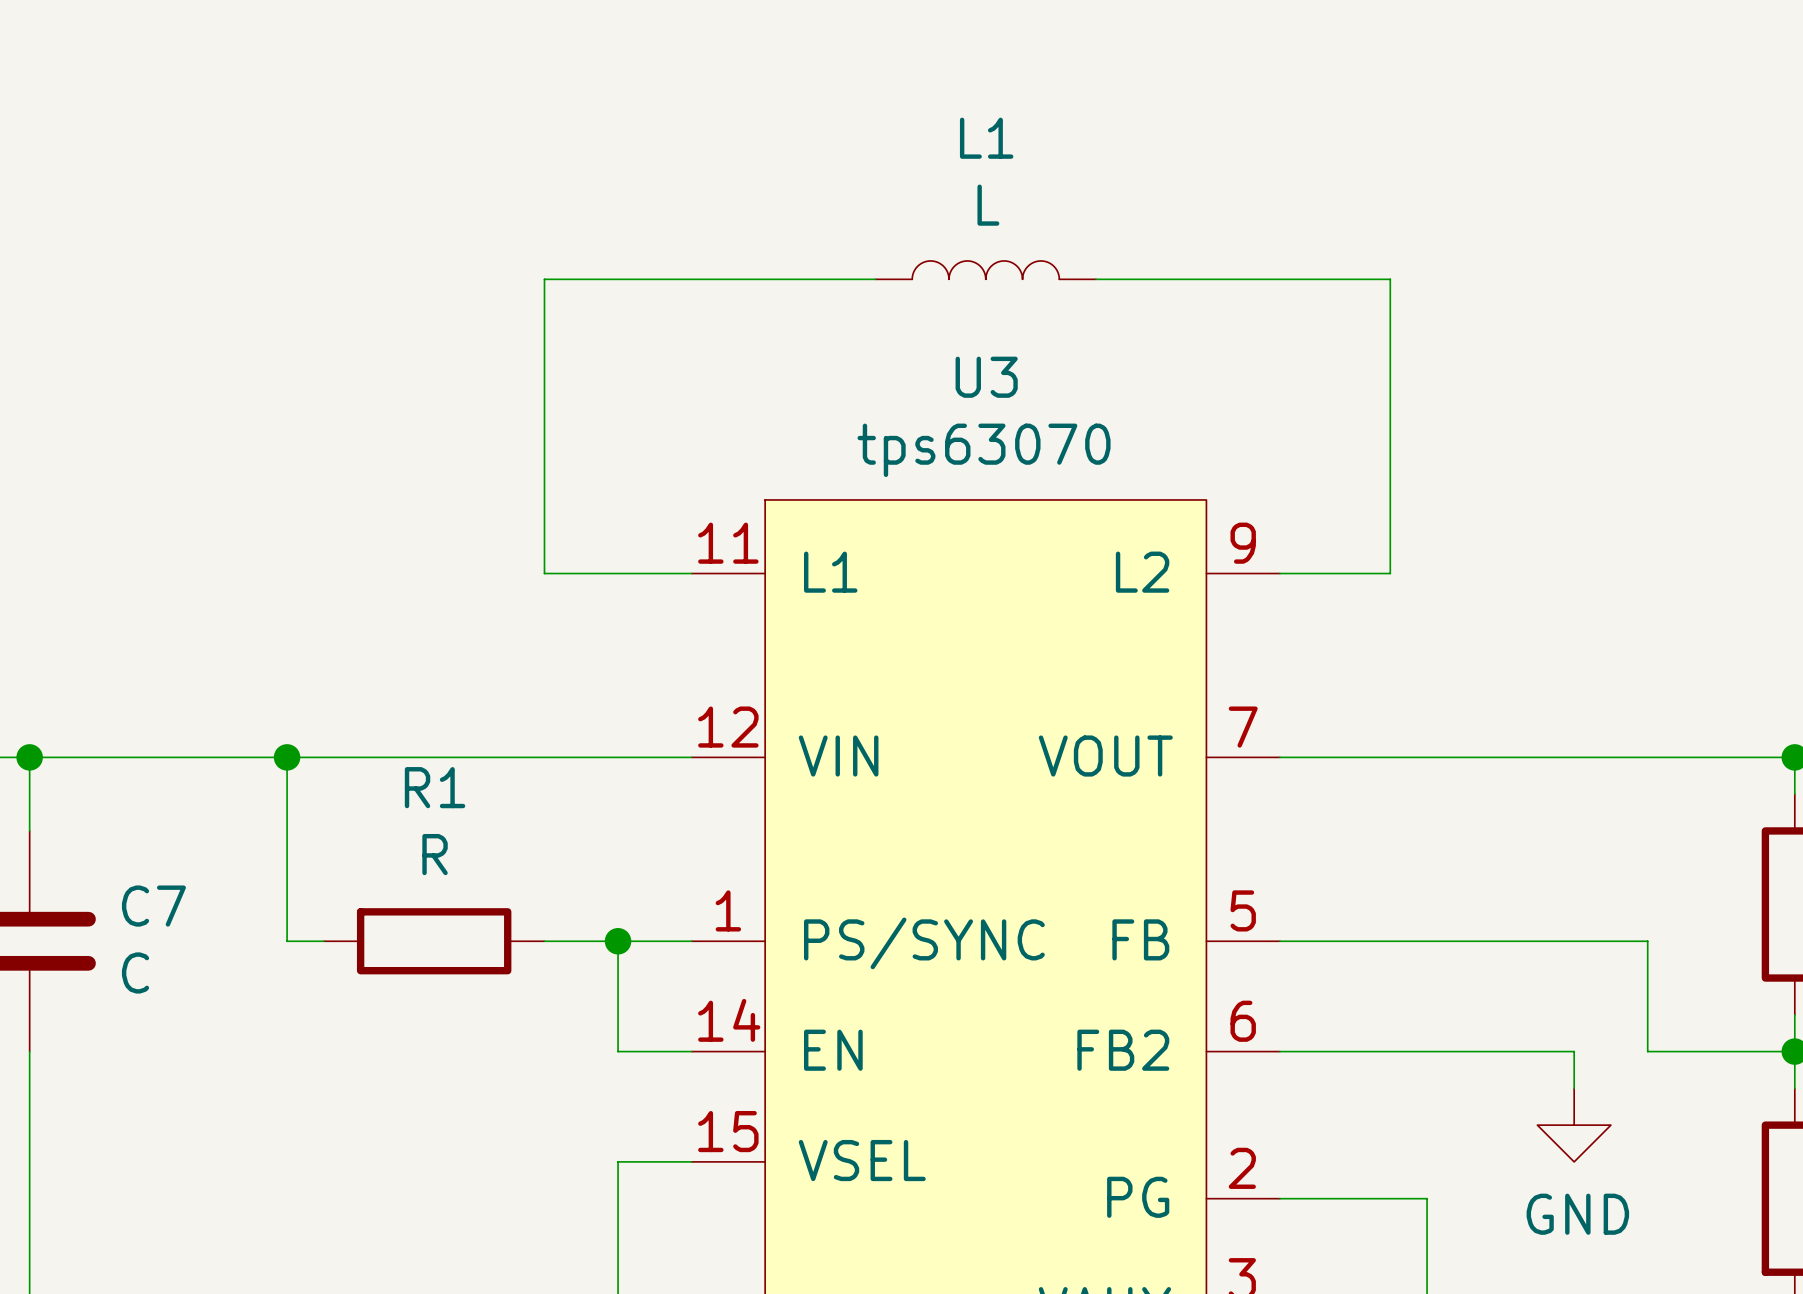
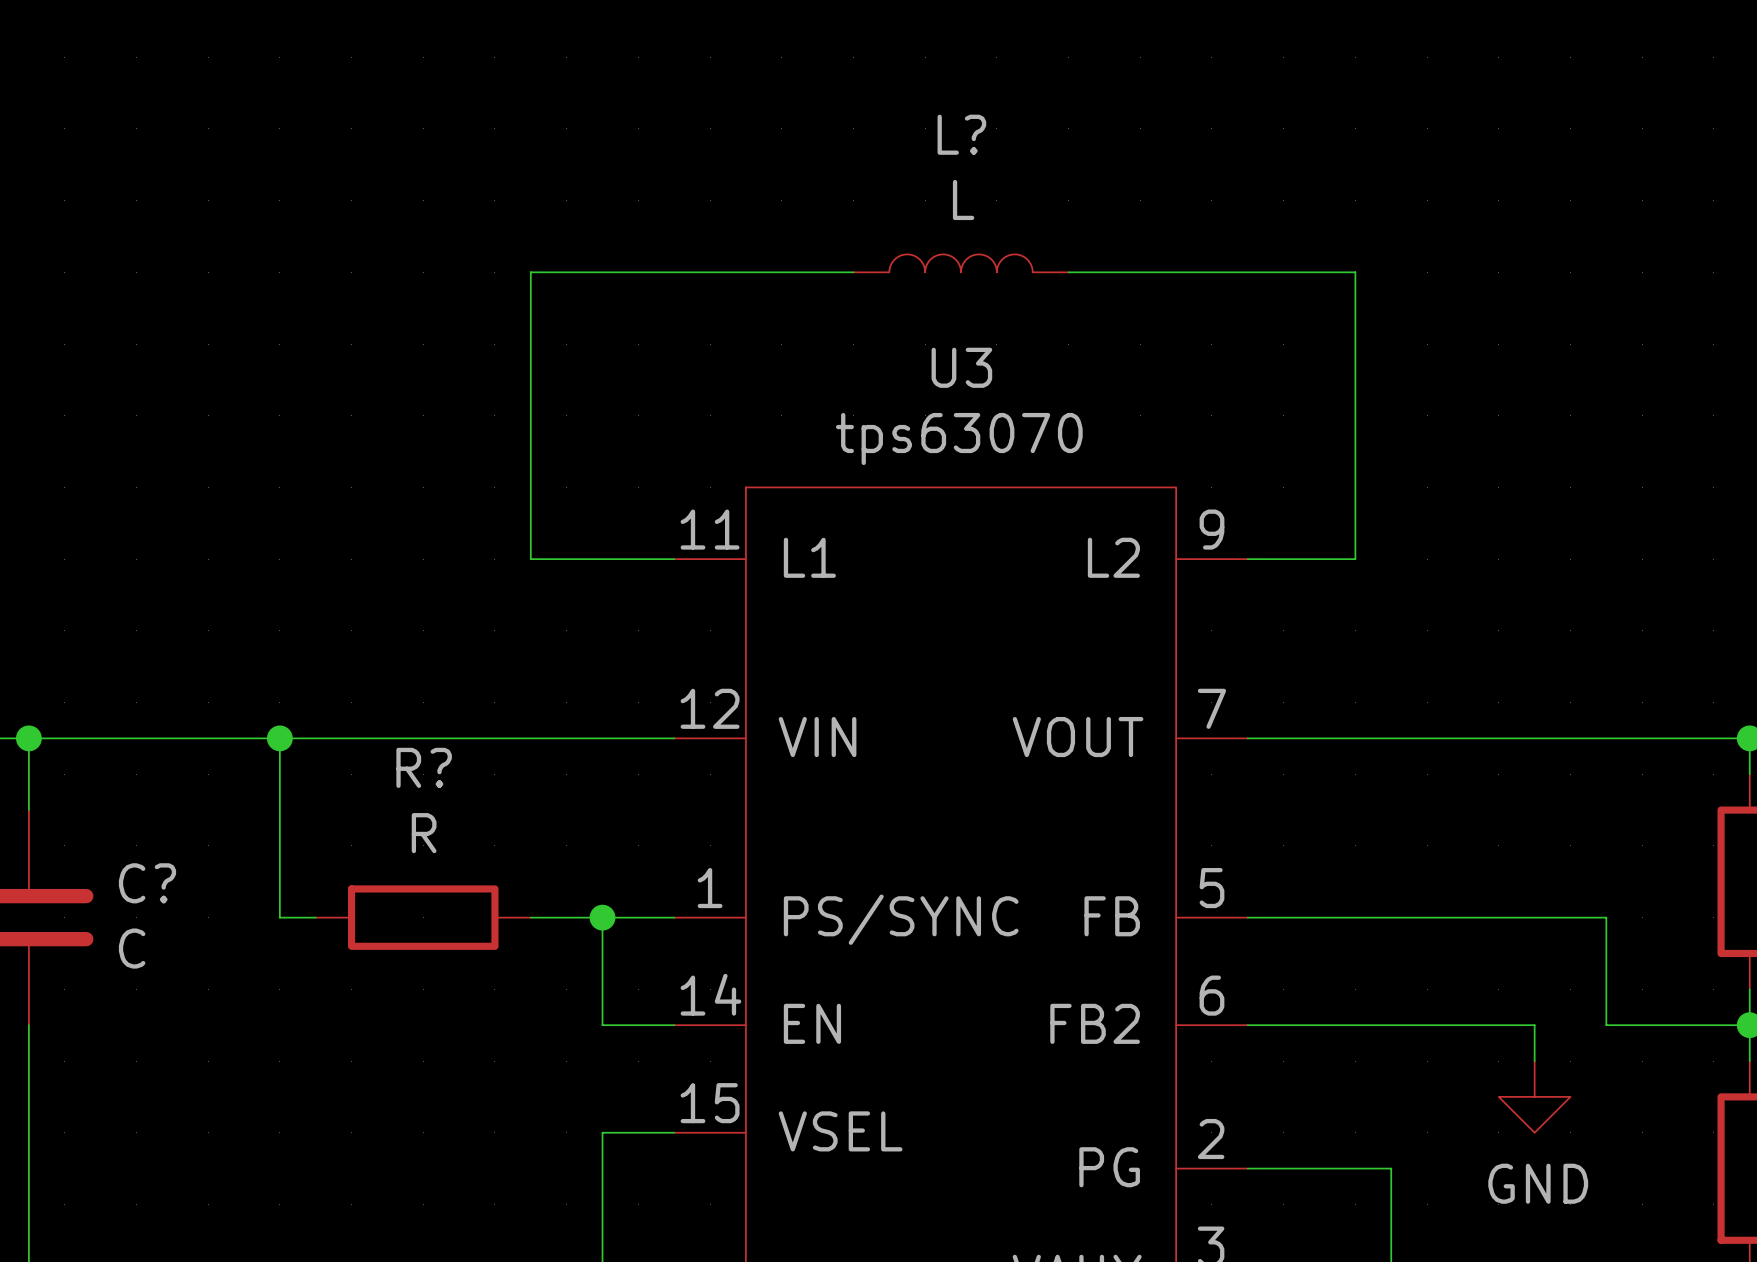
L1 name: L1 (986, 138) -> L? (961, 134)
R1 name: R1 (435, 787) -> R? (424, 767)
C7 name: C7 (153, 906) -> C? (147, 883)

